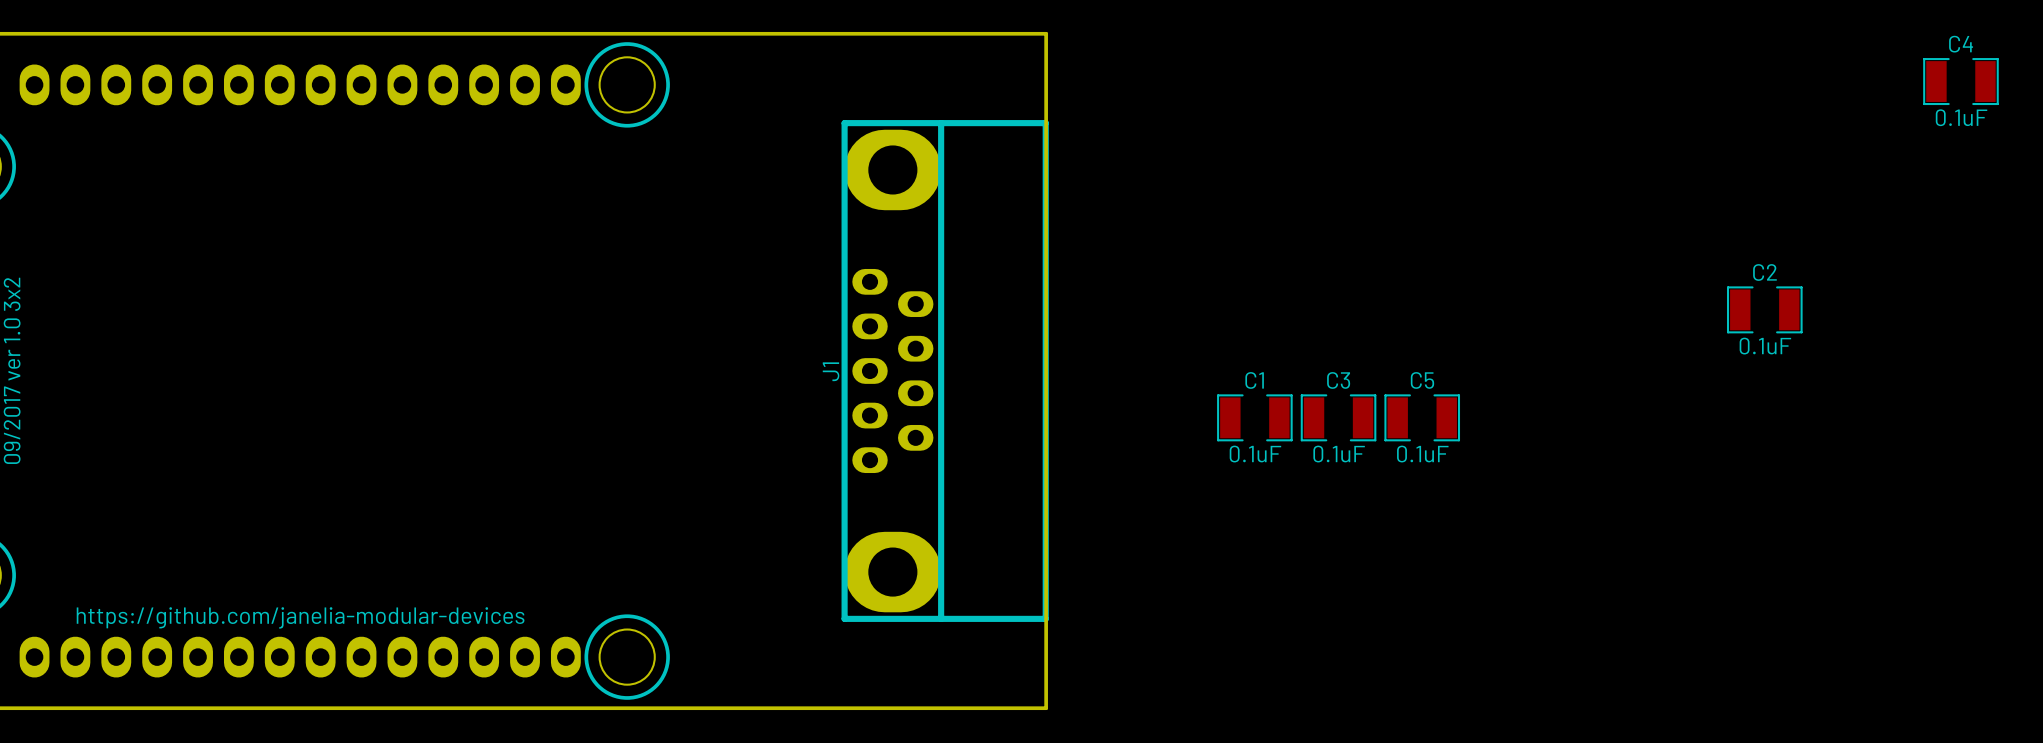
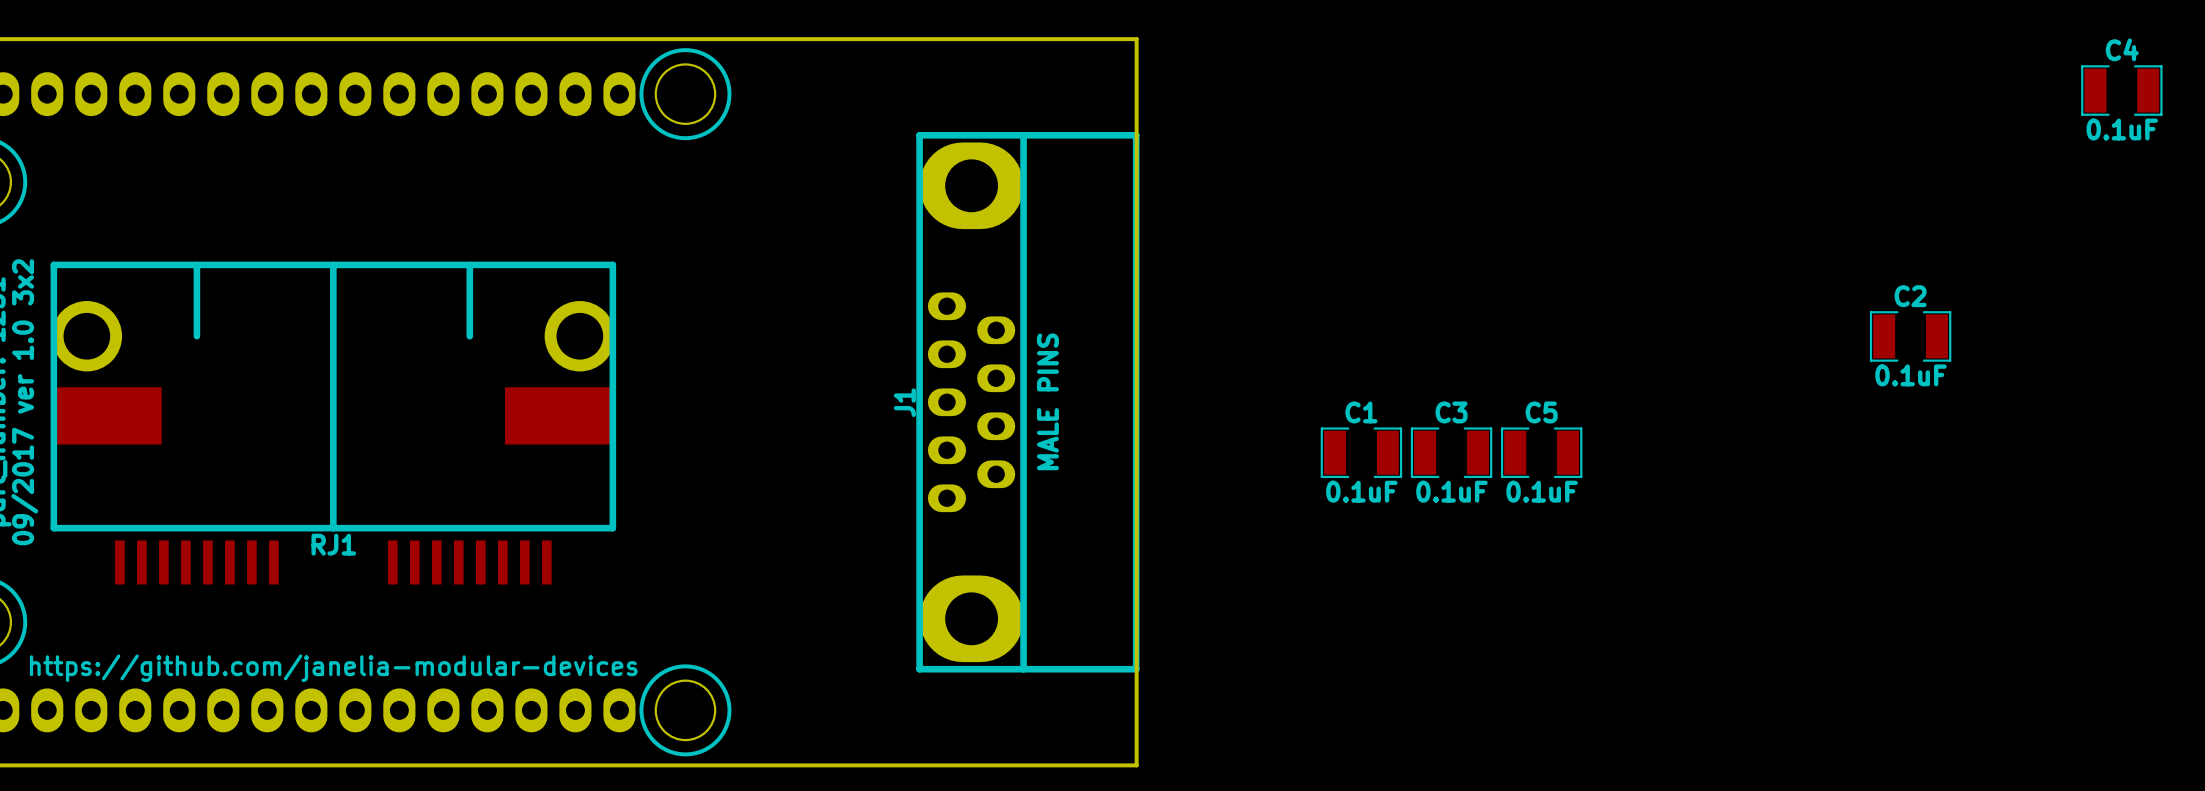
J1 text: none -> MALE PINS (1047, 401)
RJ1: none -> (333, 423)

